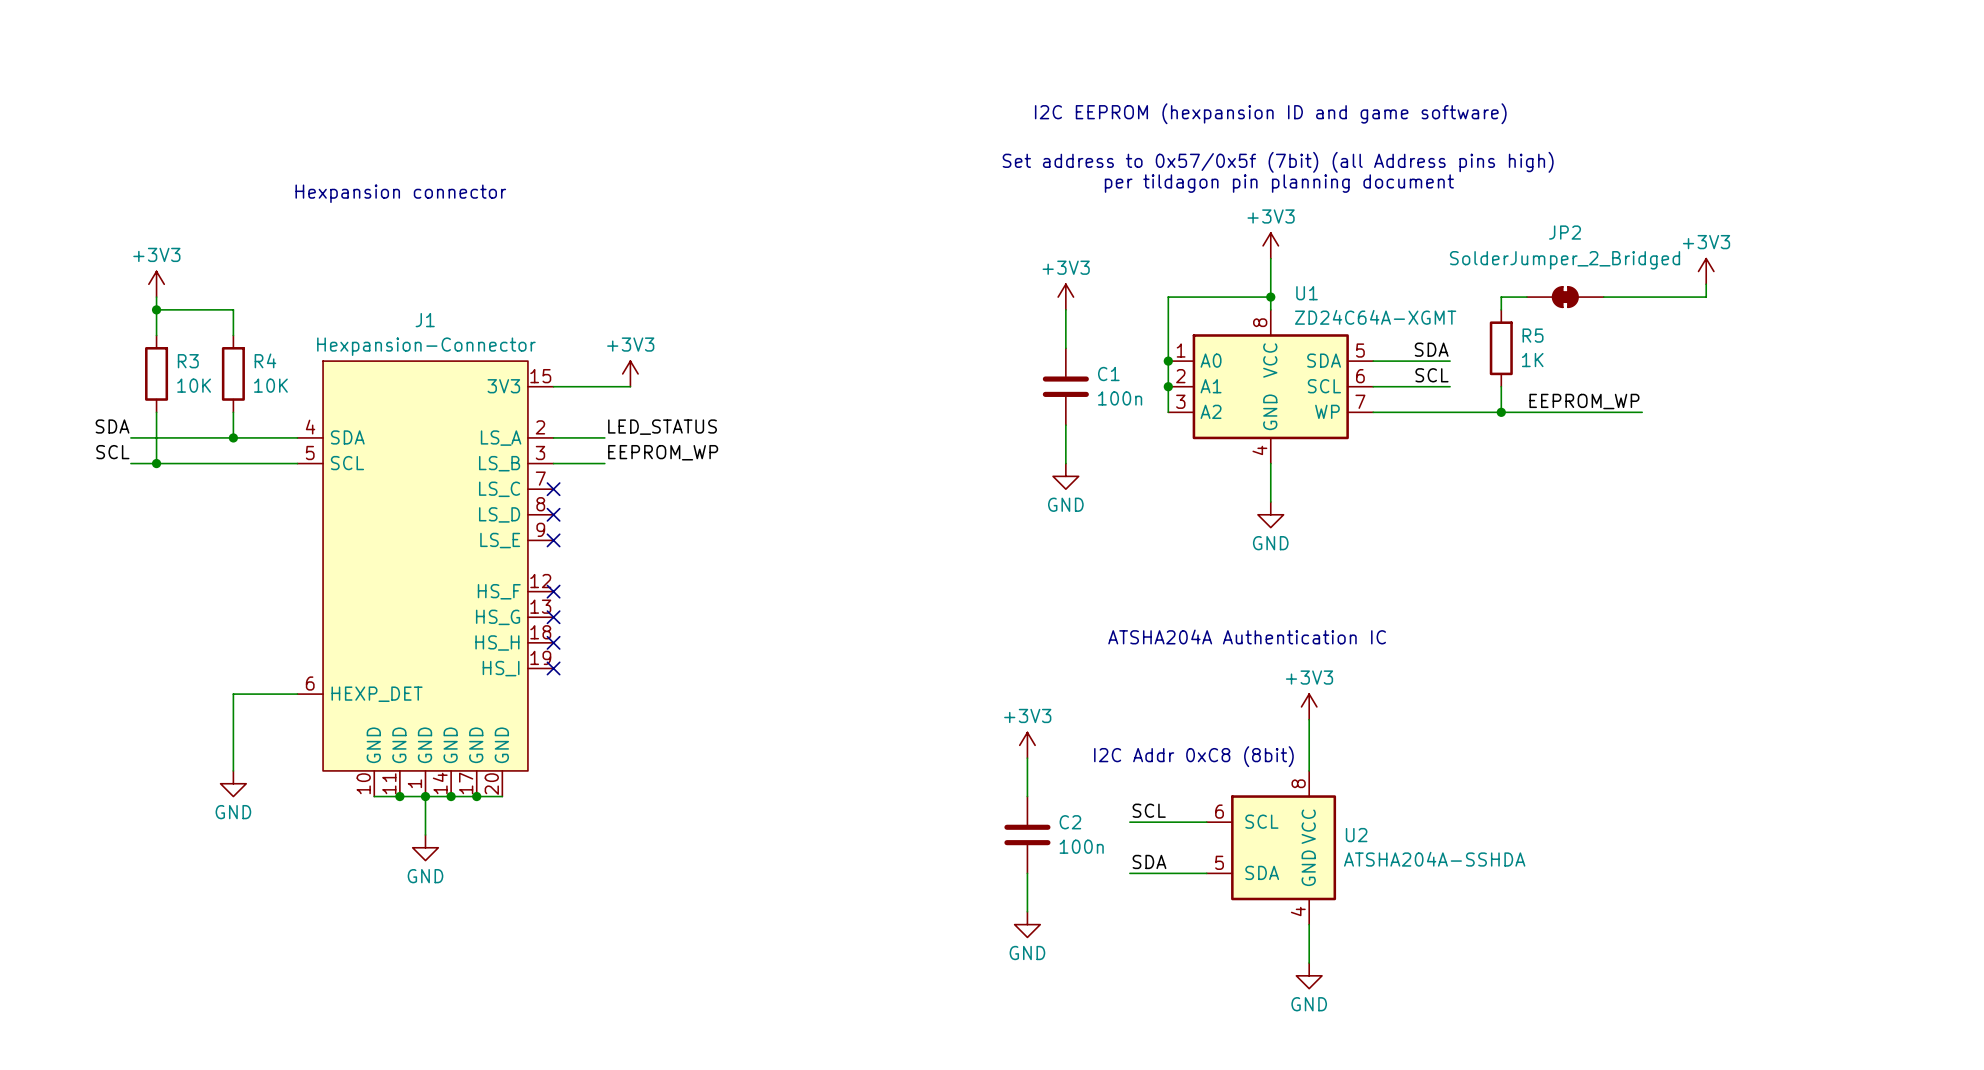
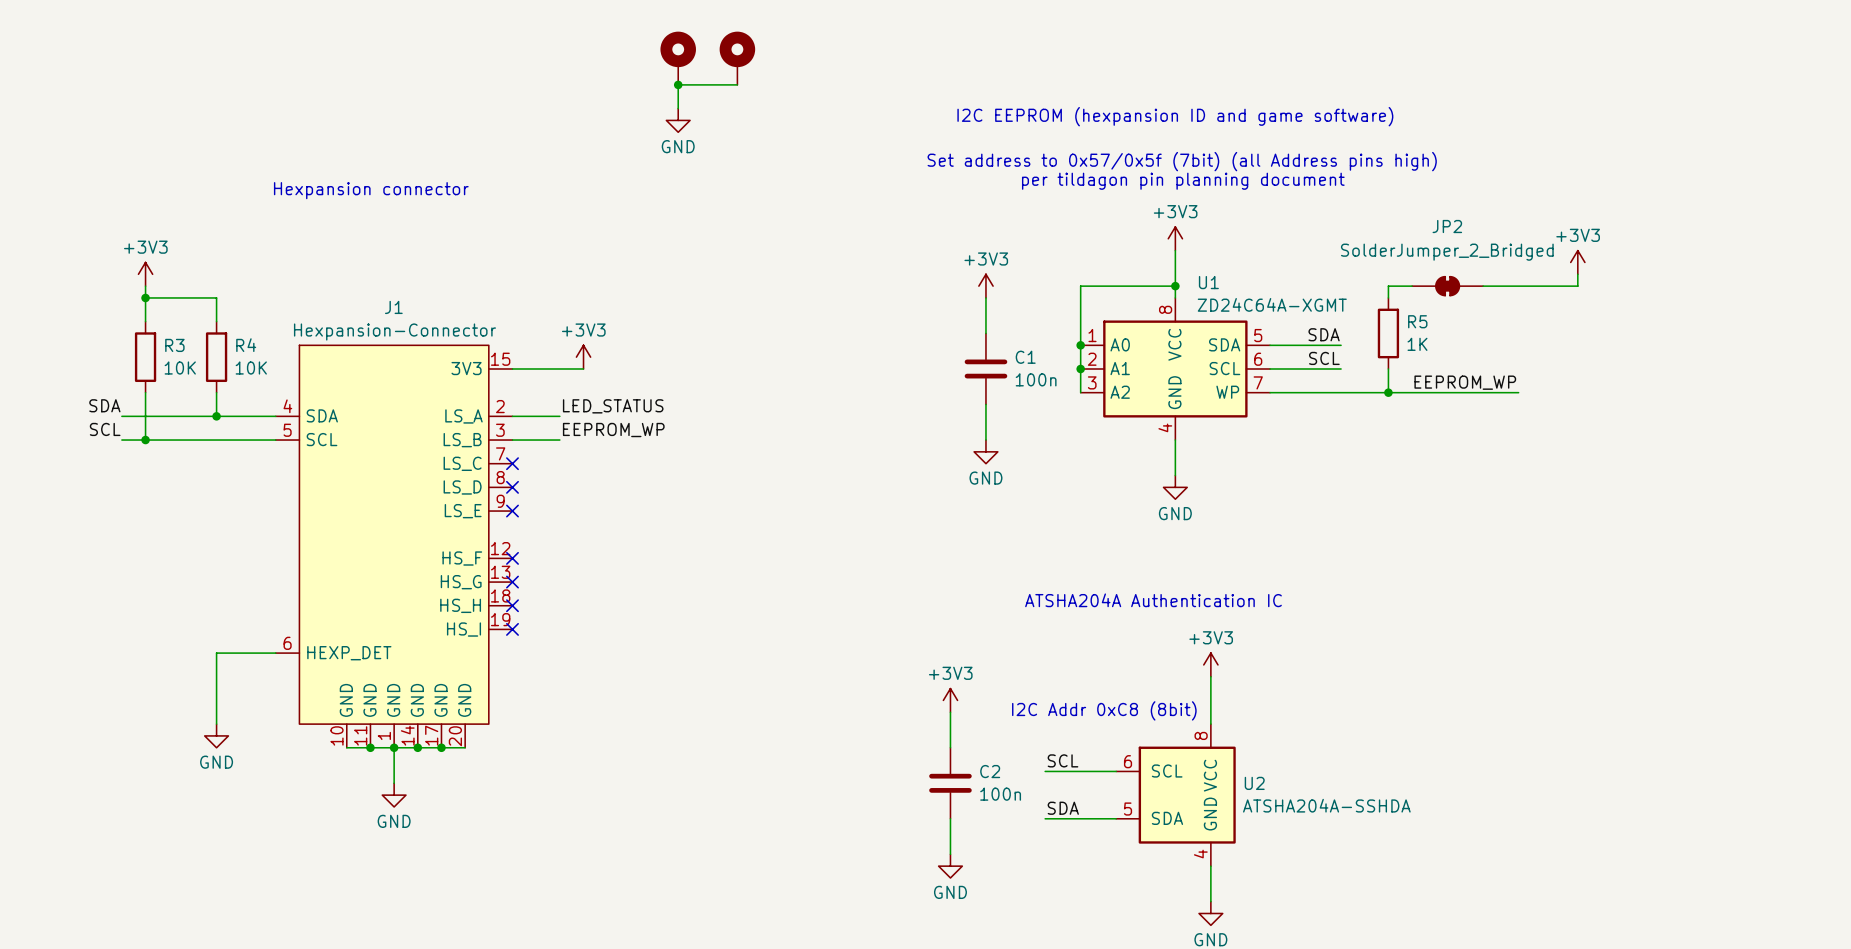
part: none -> (678, 58)
part: none -> (737, 58)
junction: none -> (678, 84)
wire: none -> (737, 84) (678, 84) (678, 108)
power symbol: none -> GND (678, 120)

